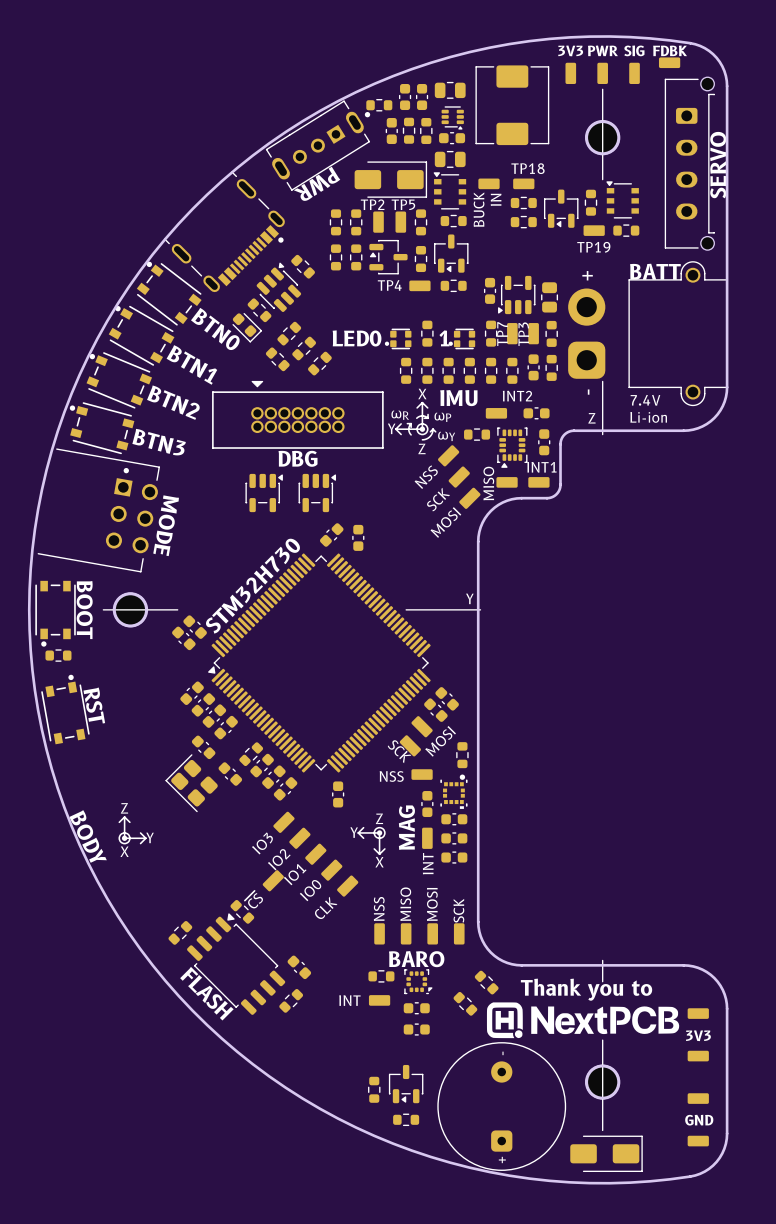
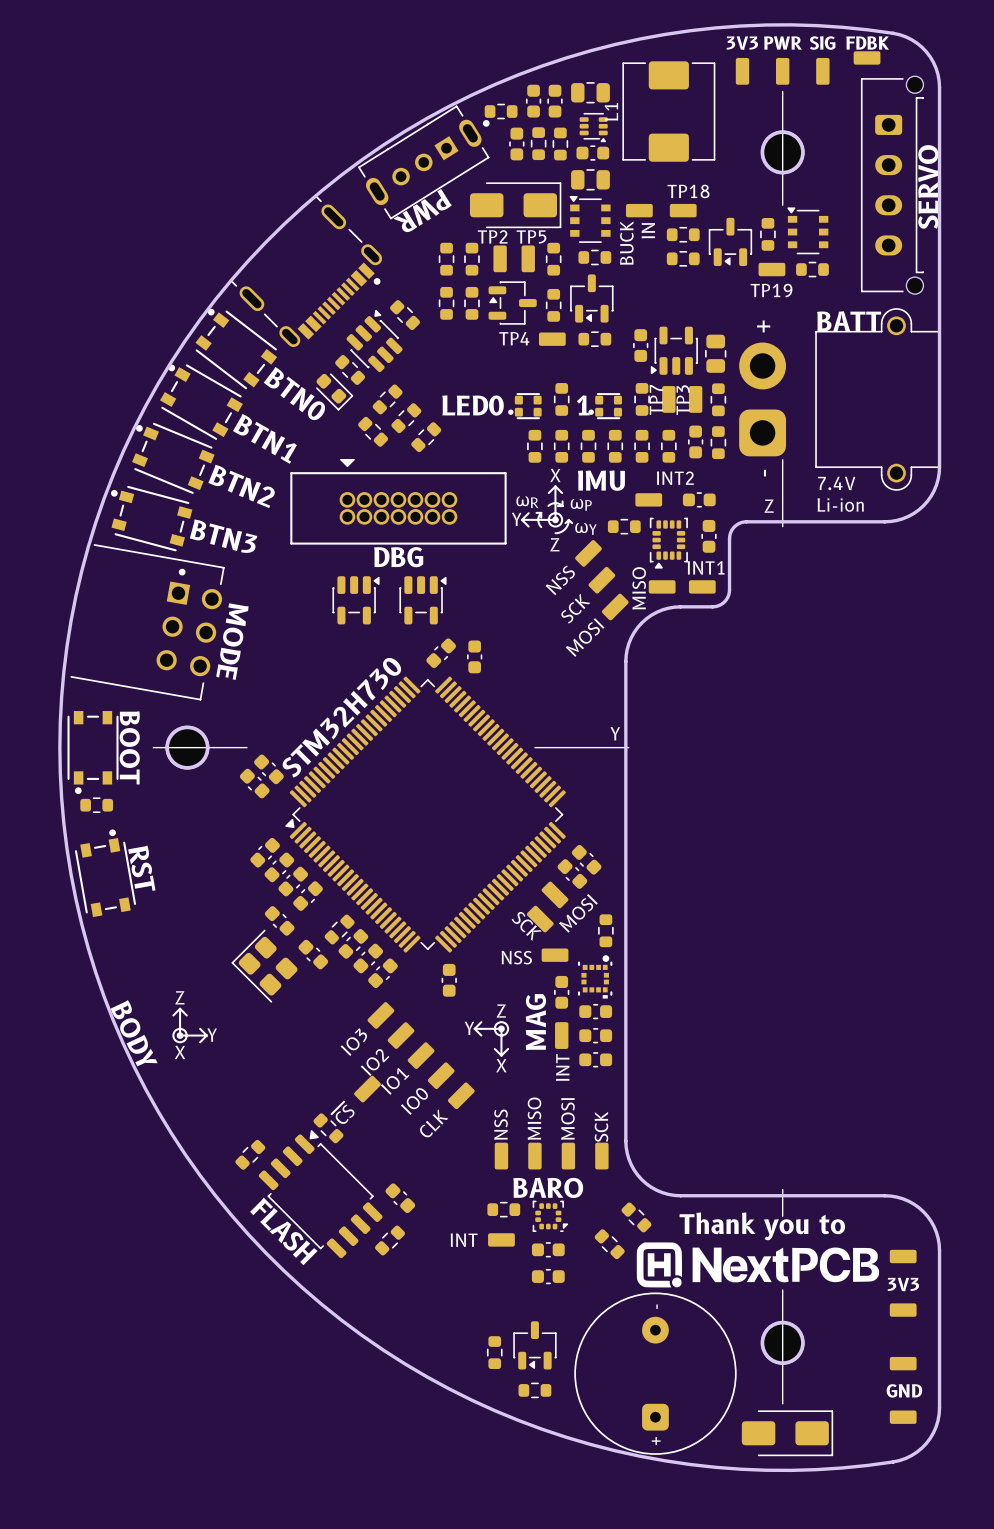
L1 name: none -> L1 (611, 111)

